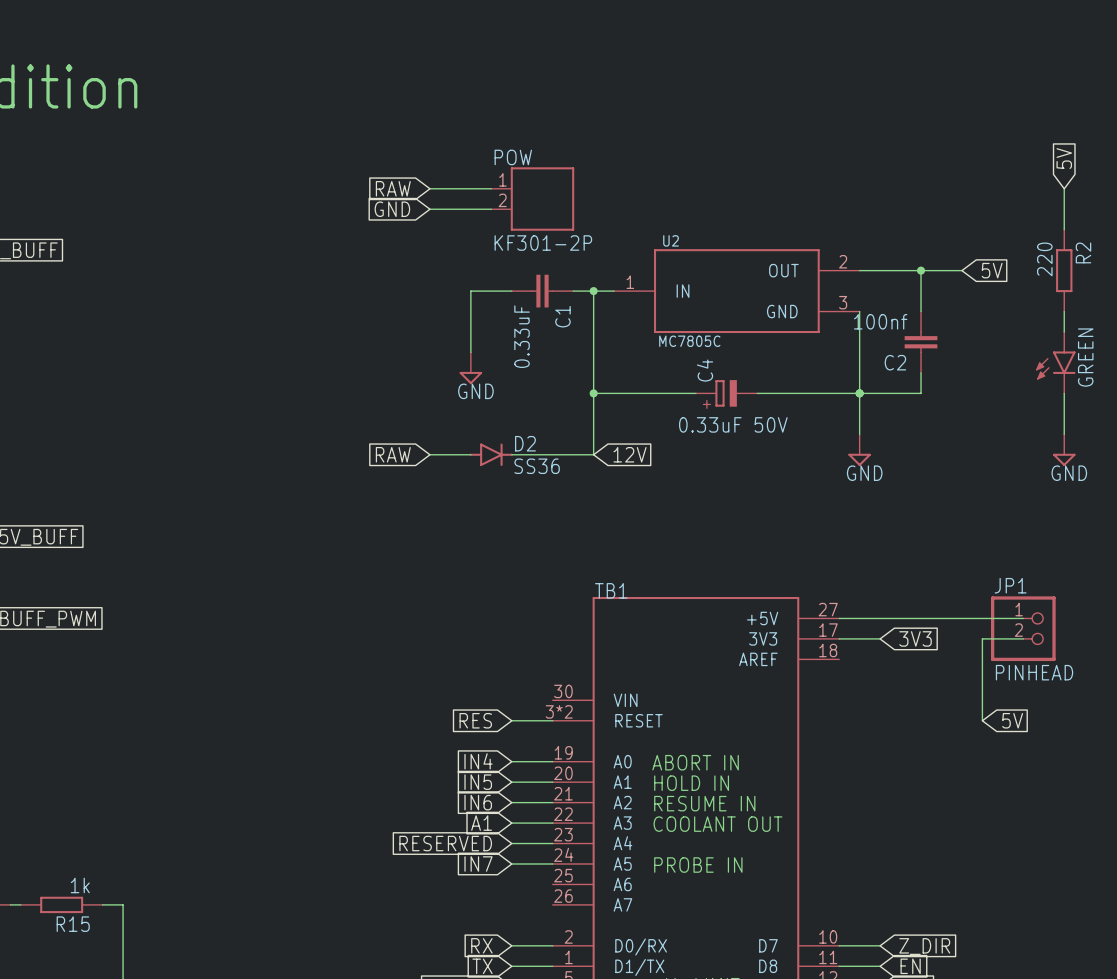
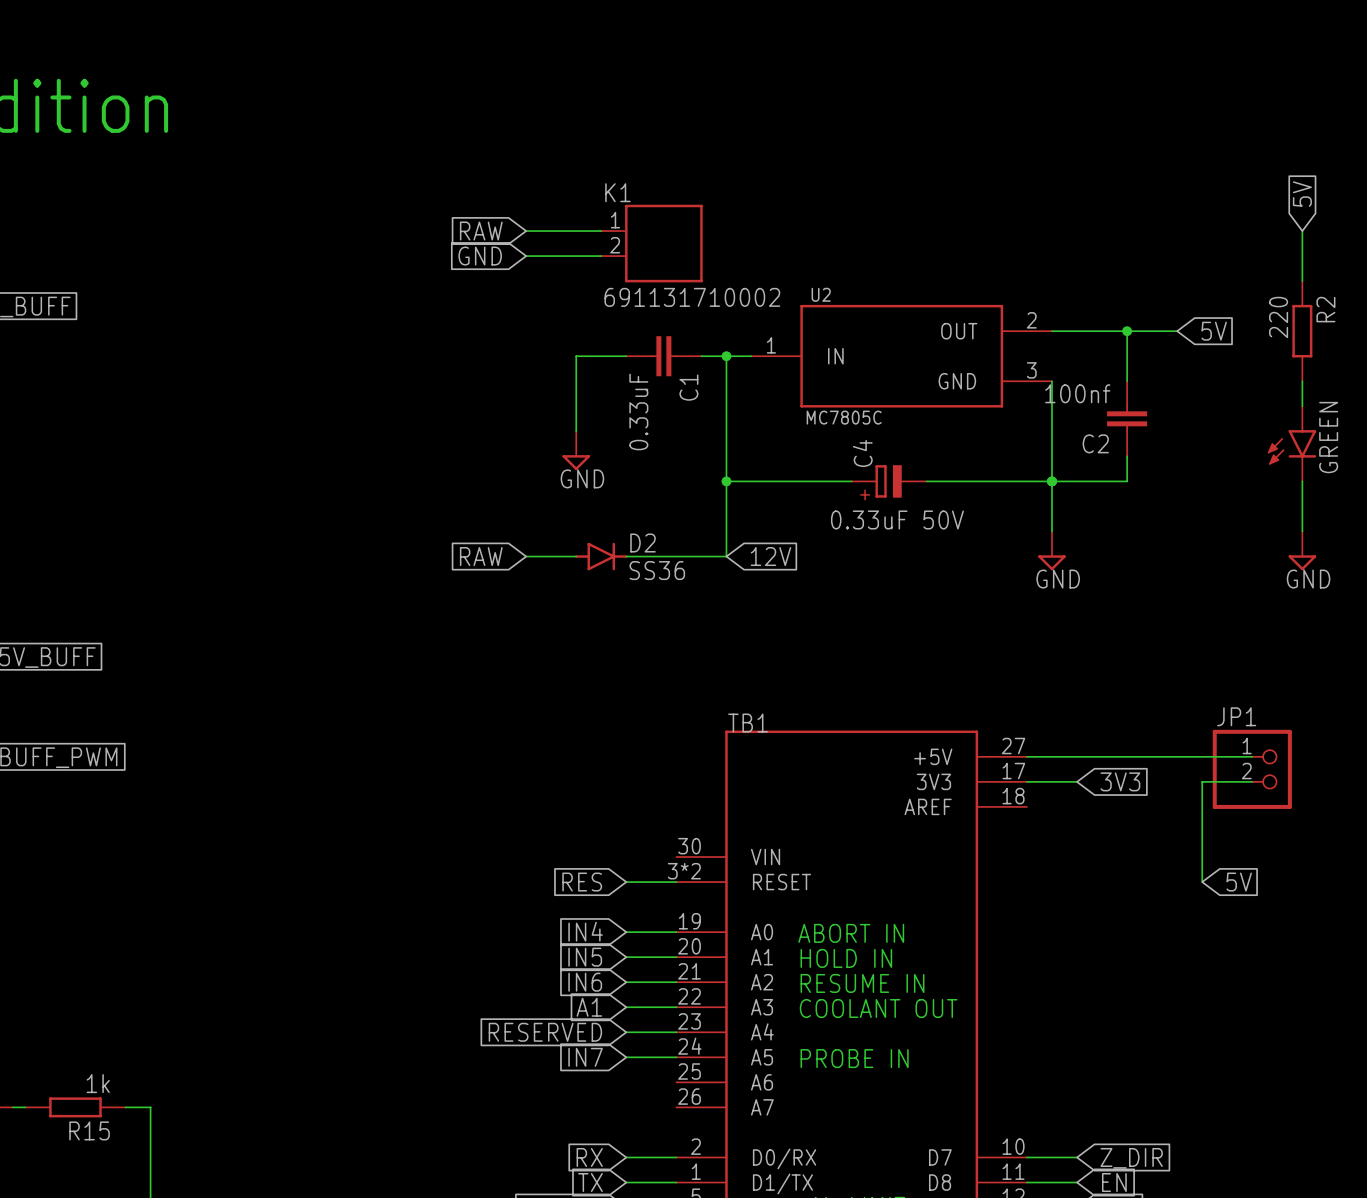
POW name: POW (513, 157) -> K1 (617, 192)
POW value: KF301-2P (543, 243) -> 691131710002 (692, 297)
JP1 value: PINHEAD (1034, 672) -> none

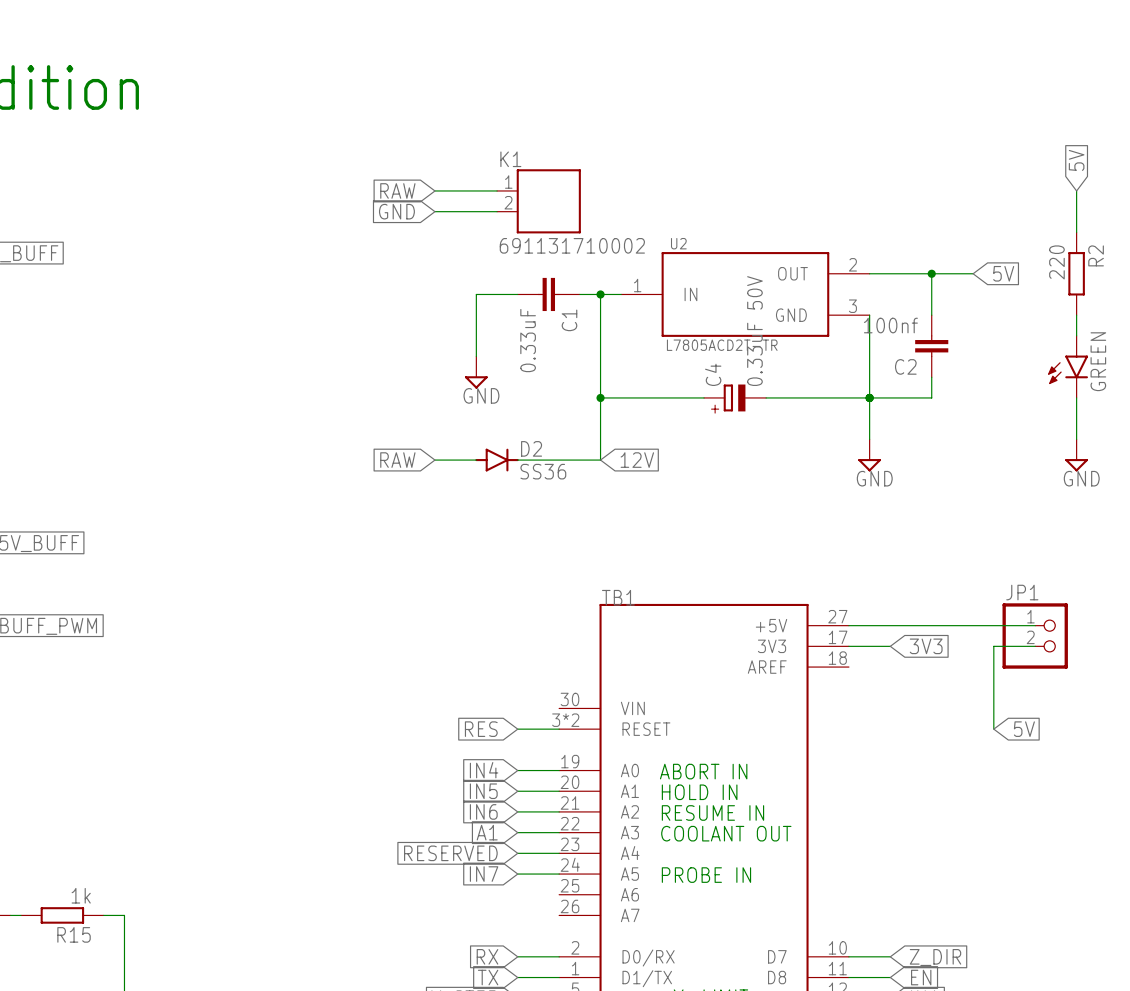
U2 value: MC7805C (844, 417) -> L7805ACD2T-TR (722, 345)
C4 value rotation: 0° (897, 519) -> 90° counterclockwise (754, 331)

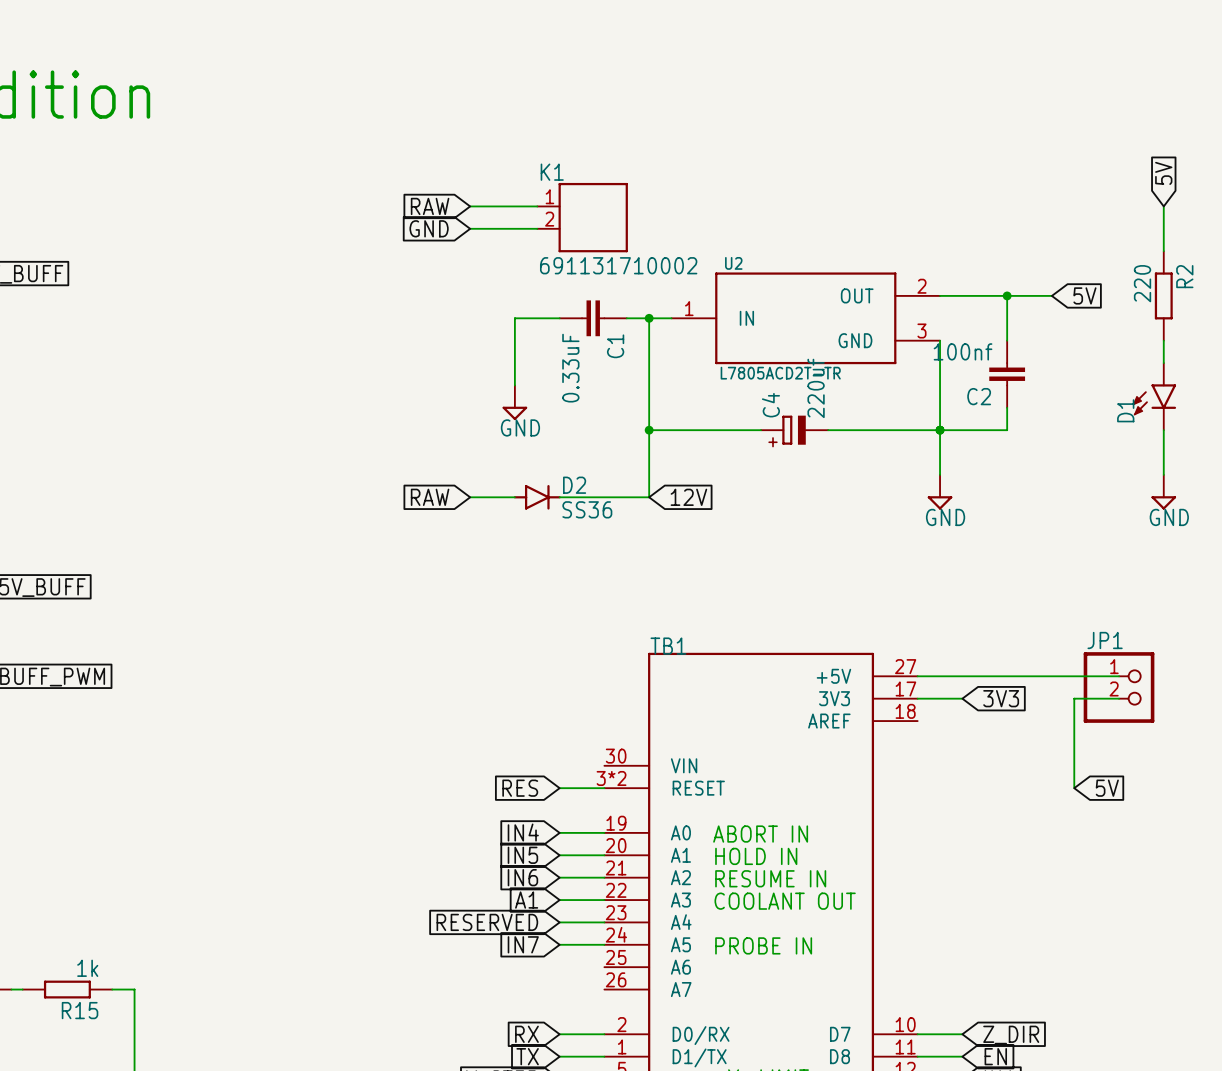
C4 value: 0.33uF 50V (754, 331) -> 220uf (816, 388)
GREEN: (1068, 366) -> none
D1: none -> (1154, 396)

